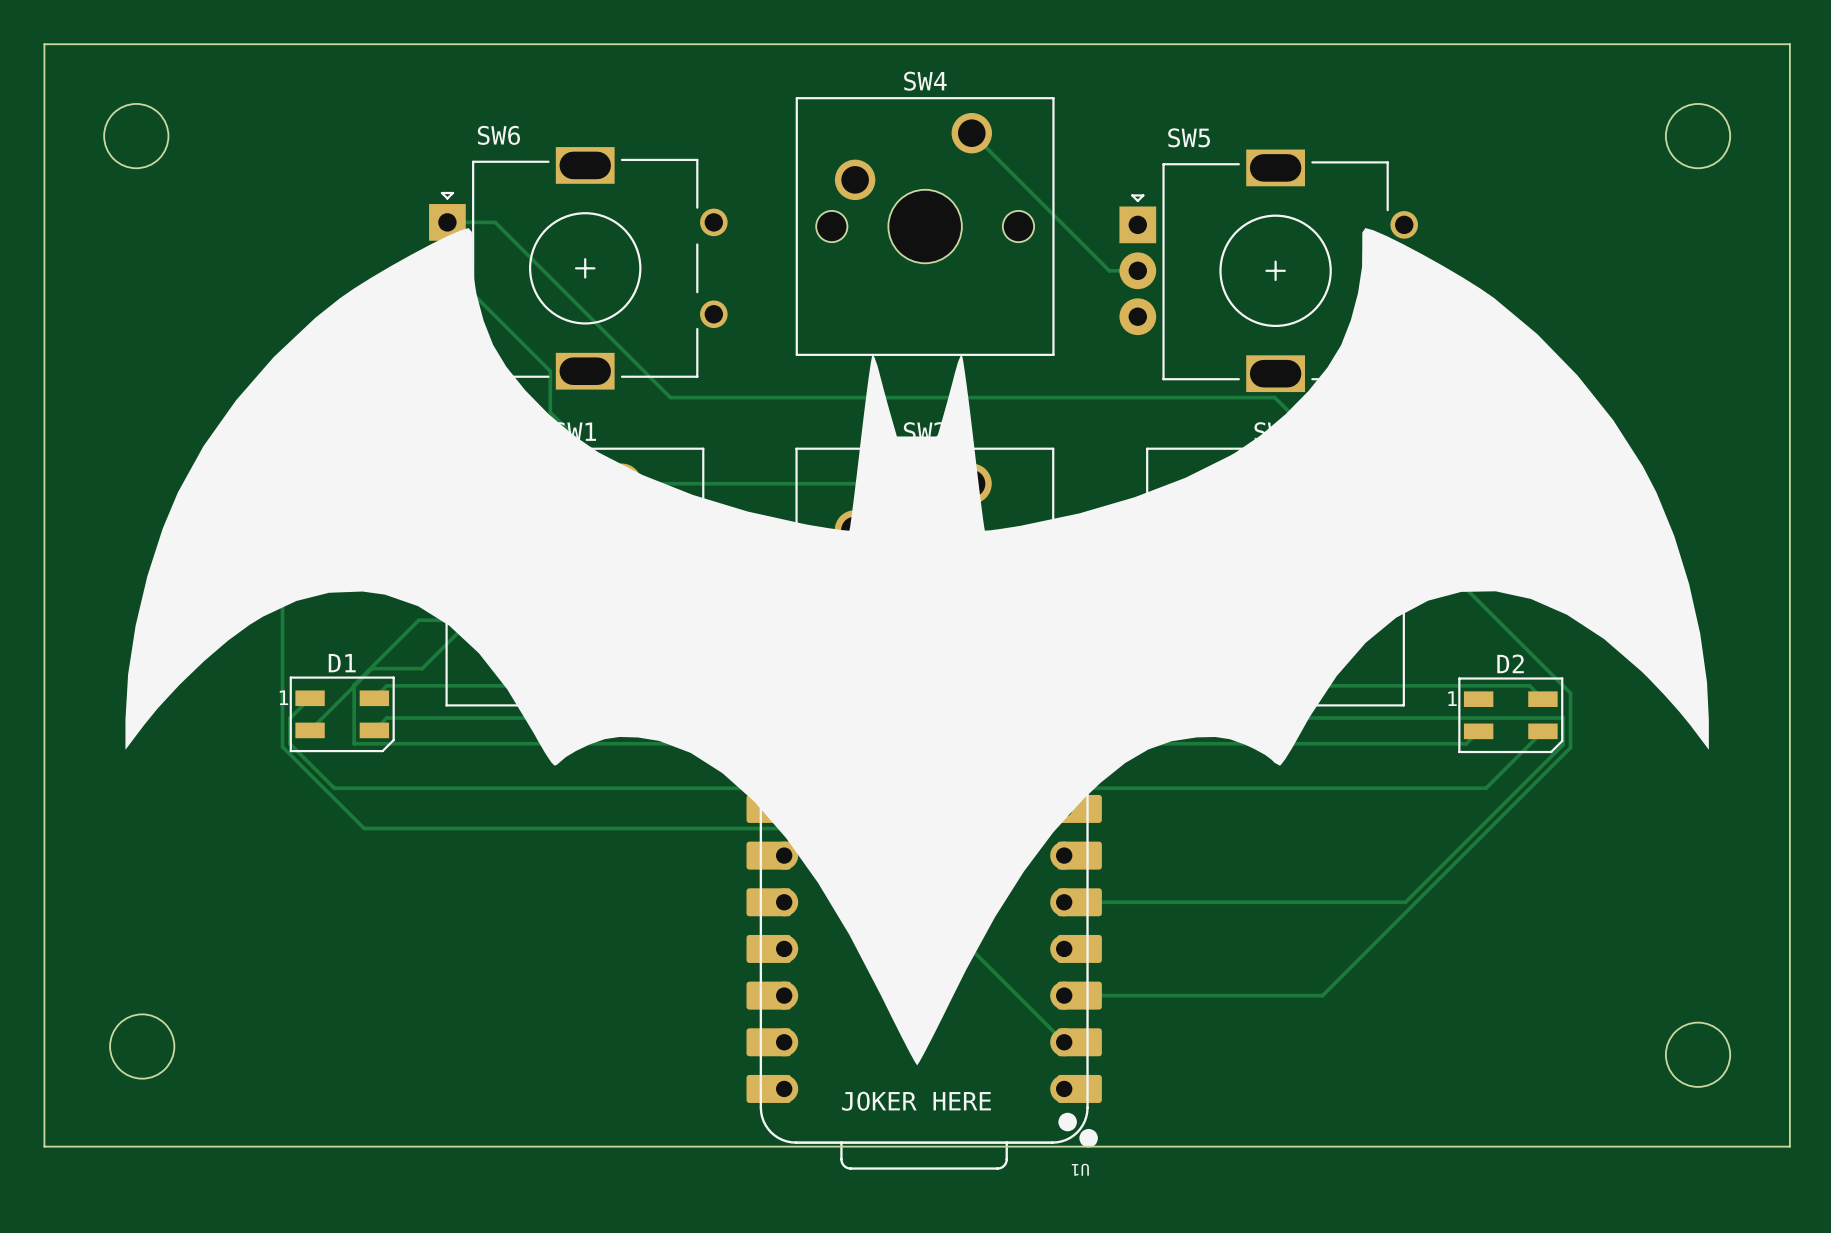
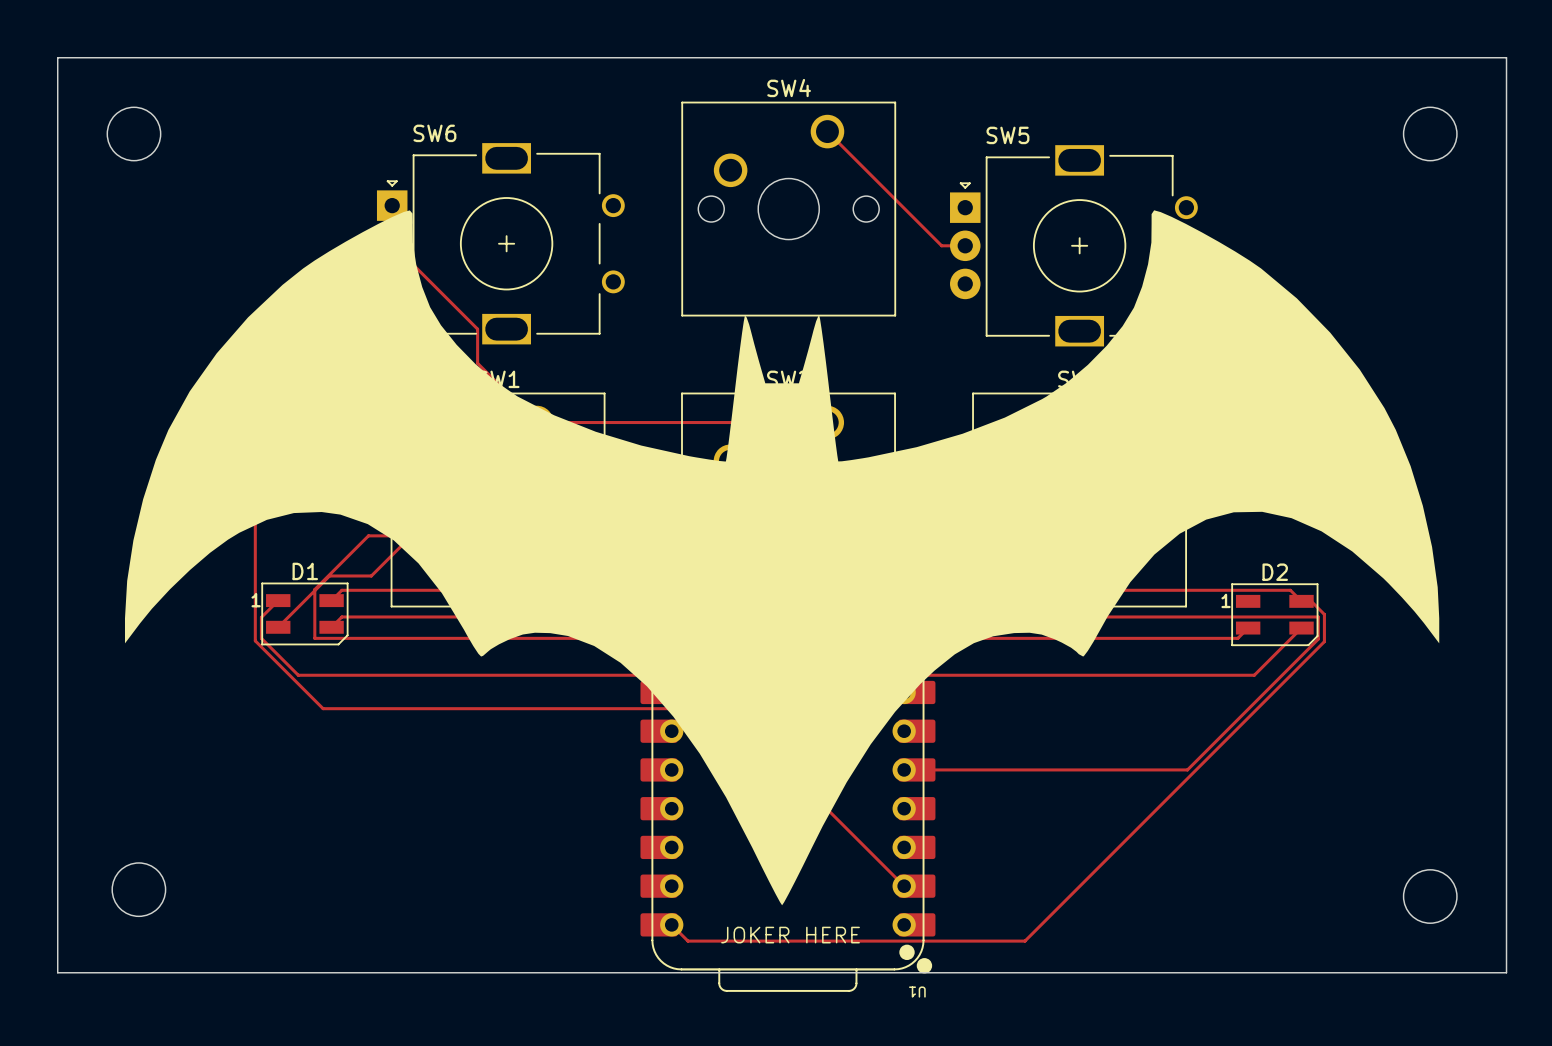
track: (447, 222) (495, 222) (670, 397) (1274, 397) (1570, 693) (1570, 714) -> (1301, 601) (1311, 601) (1324, 614)
track: (1078, 995) (1322, 995) -> (671, 924) (687, 941) (1024, 941) (1118, 847)

